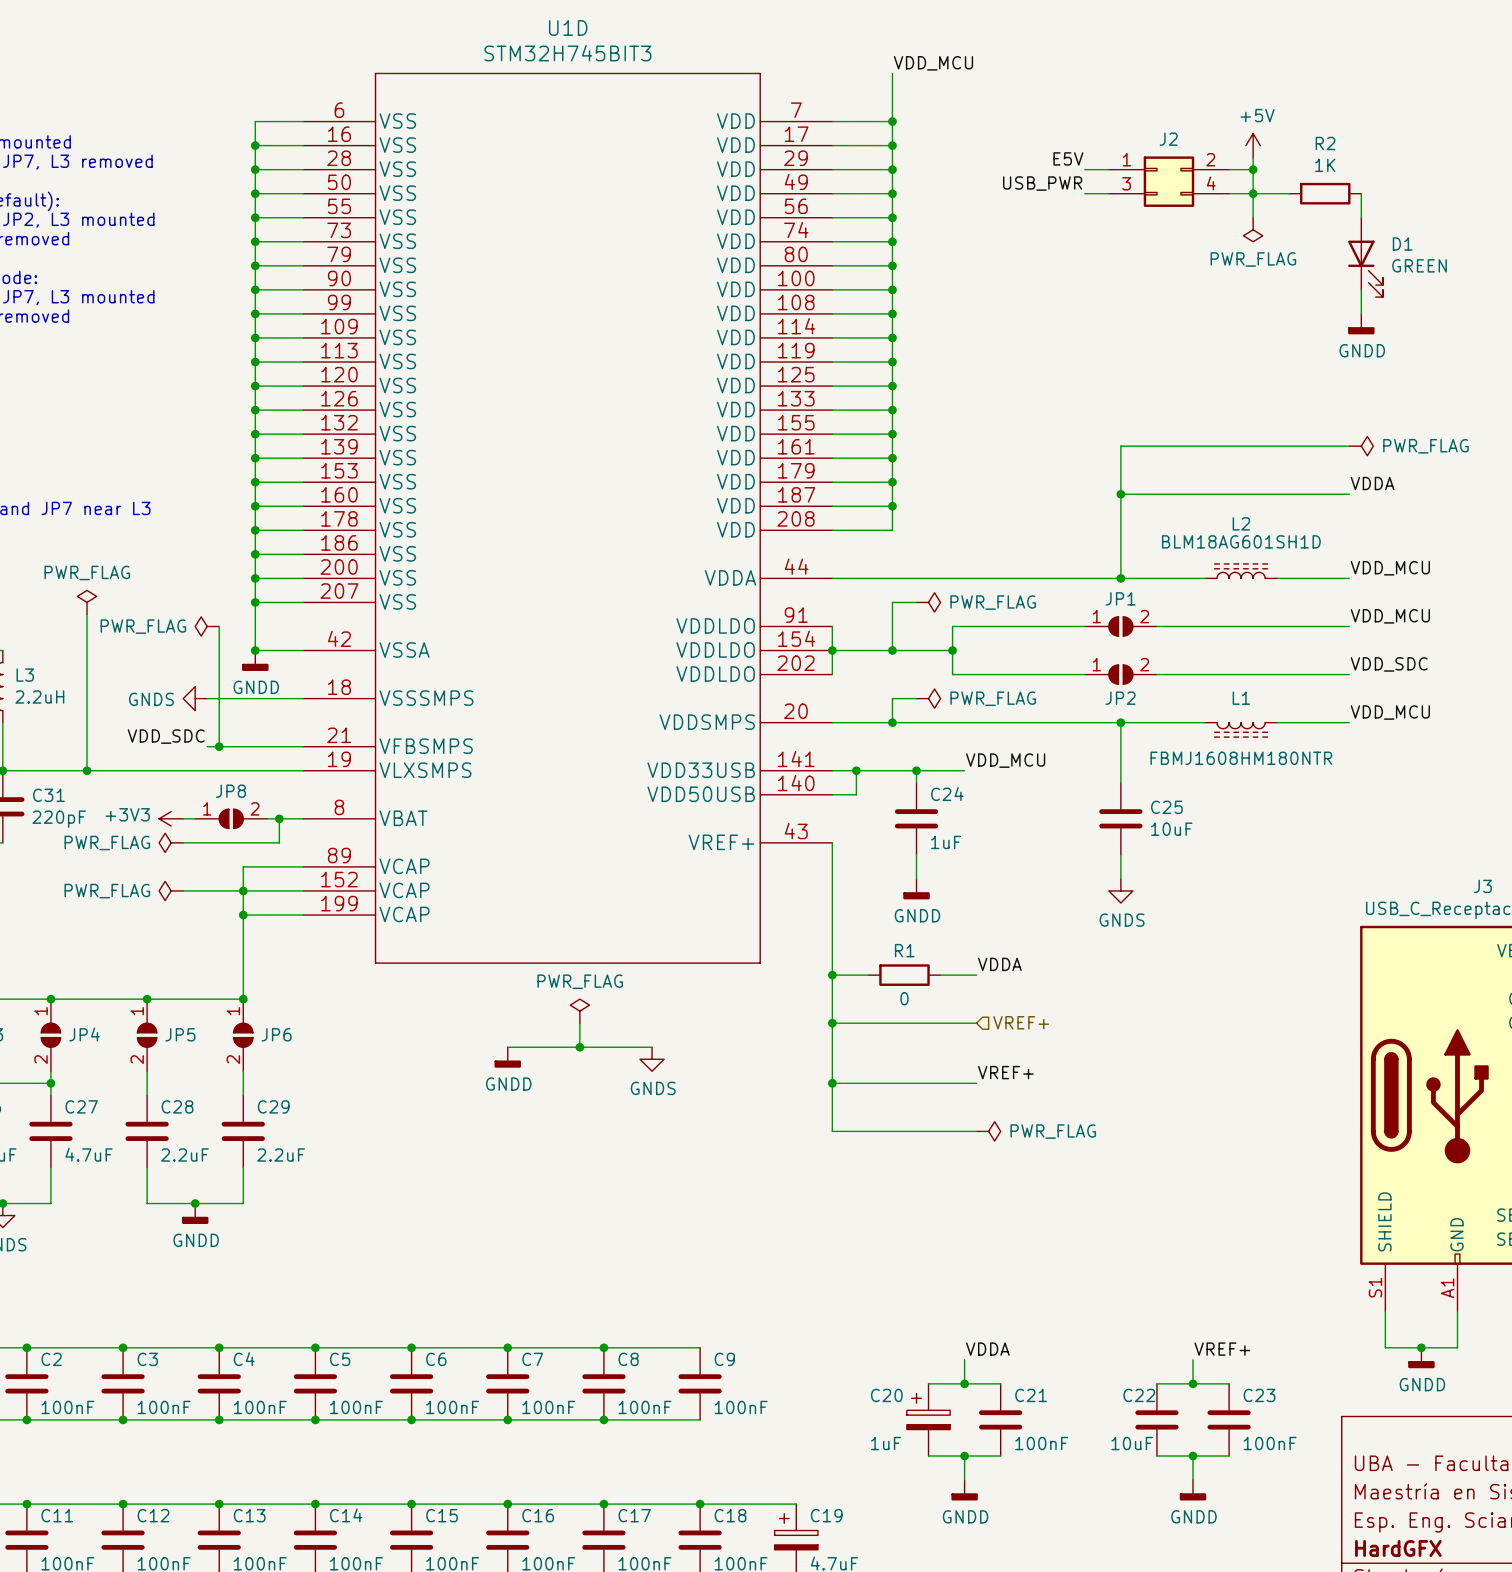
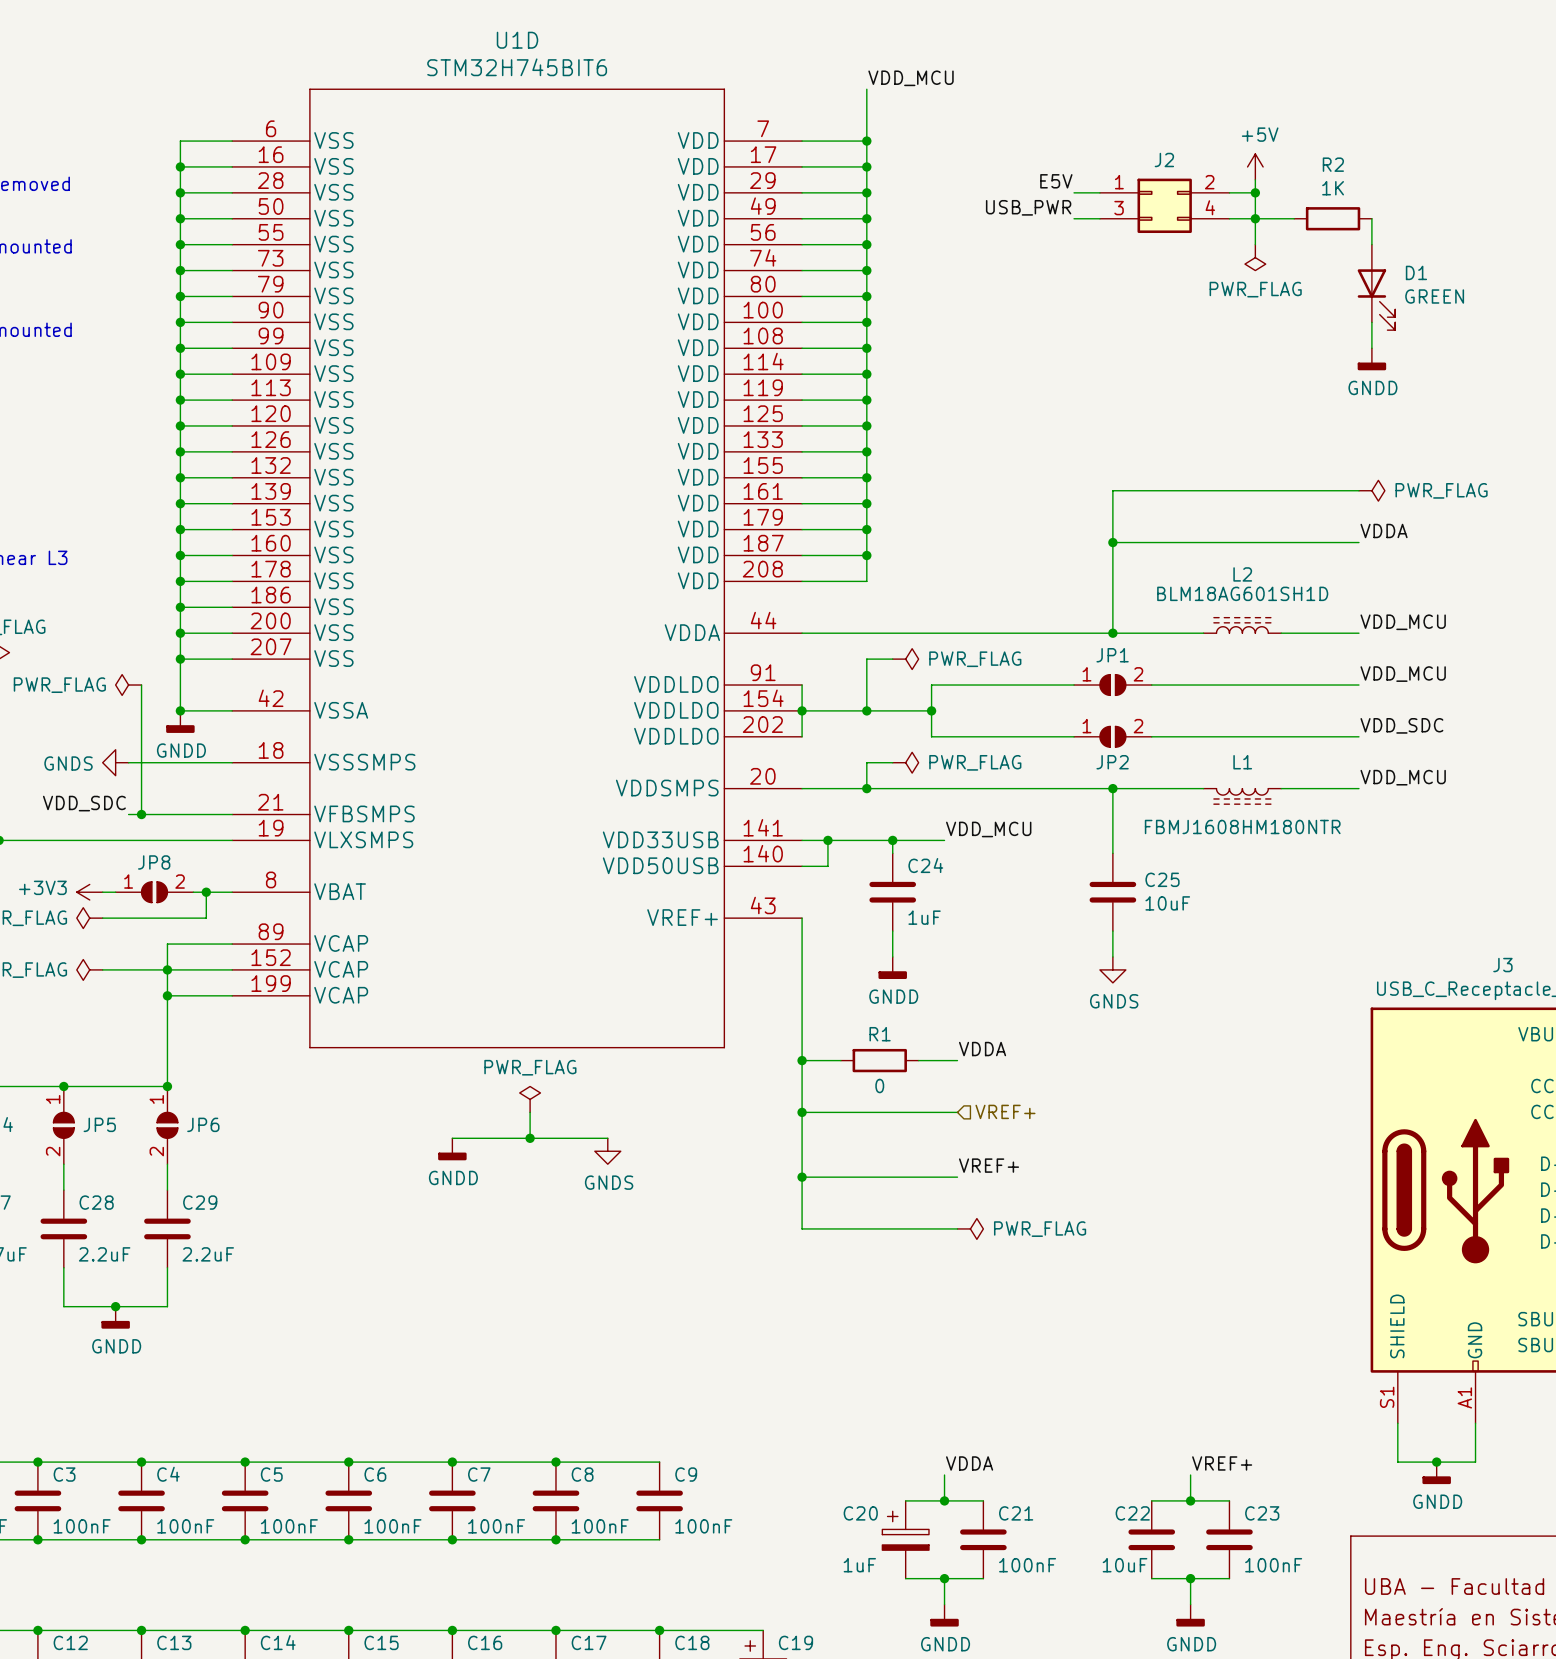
U1D value: STM32H745BIT3 (567, 53) -> STM32H745BIT6 (517, 67)

